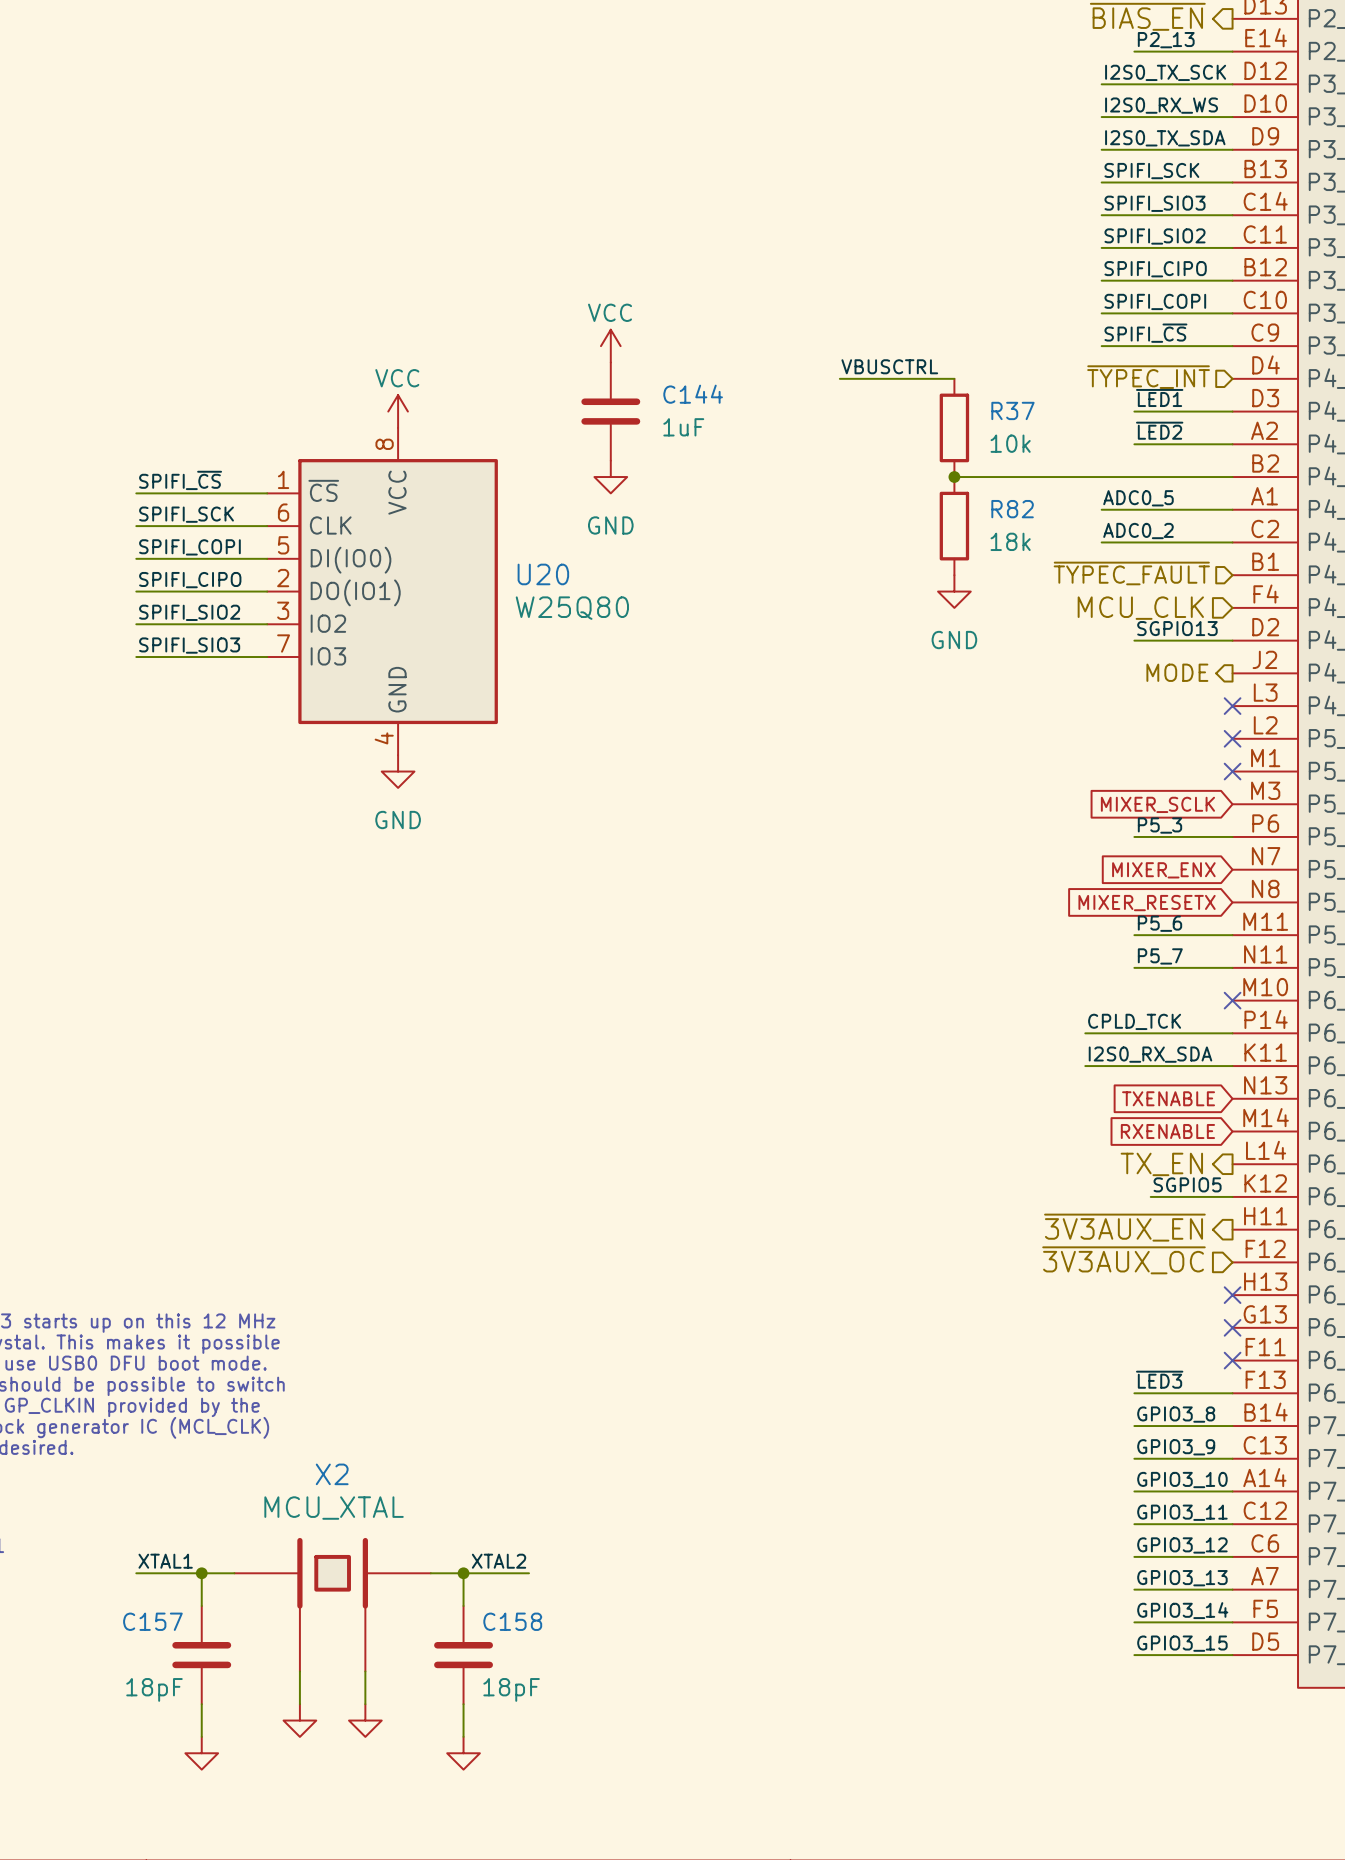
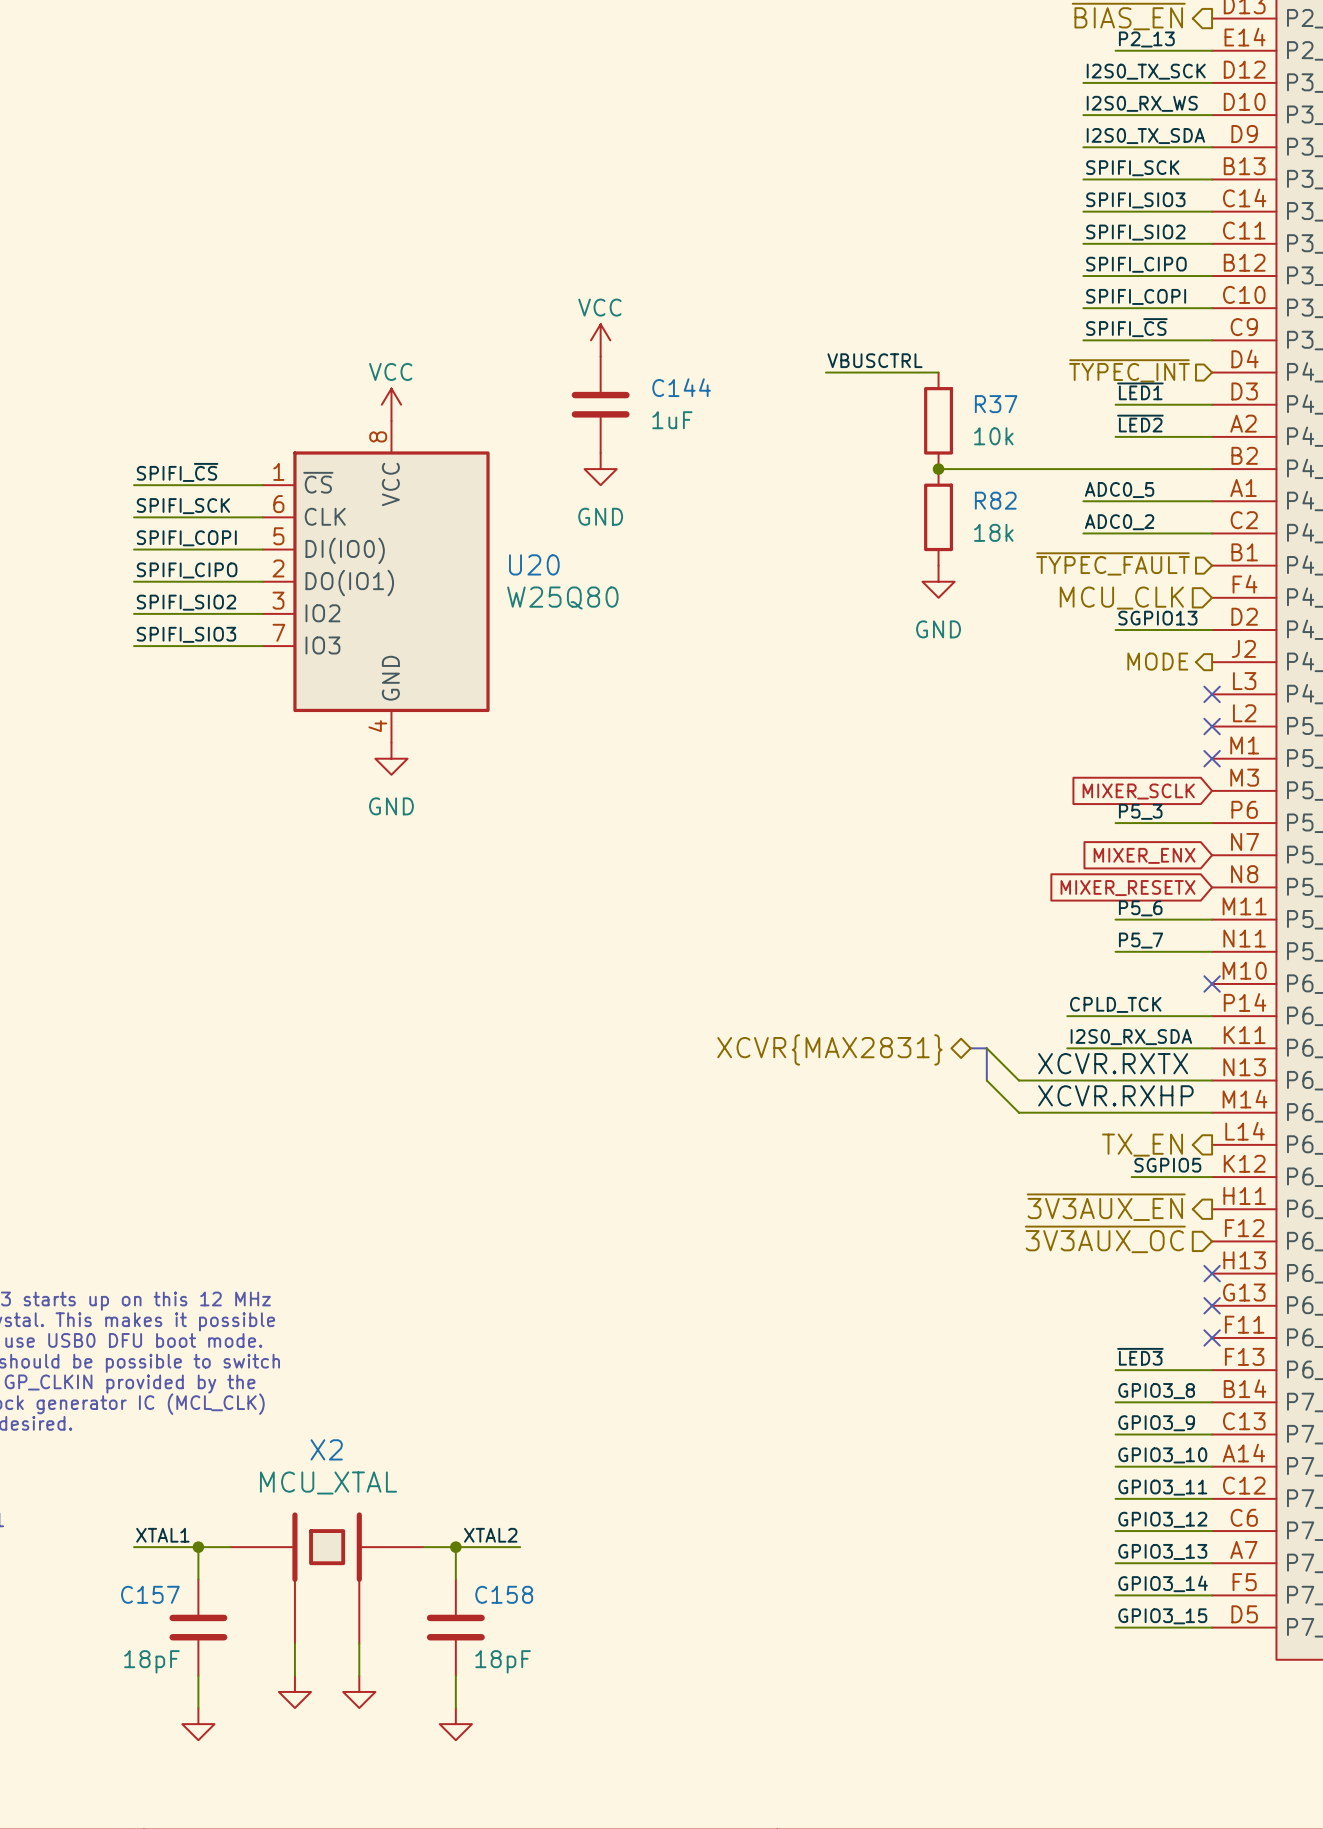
bus: none -> (970, 1048) (986, 1048) (986, 1080)
wire: none -> (986, 1048) (1019, 1080) (1212, 1080)
hierarchical label: none -> XCVR{MAX2831} (829, 1049)
label: none -> XCVR.RXTX (1113, 1063)
wire: none -> (986, 1080) (1019, 1112) (1212, 1112)
global label: TXENABLE (1168, 1098) -> none
label: none -> XCVR.RXHP (1115, 1095)
global label: RXENABLE (1167, 1131) -> none

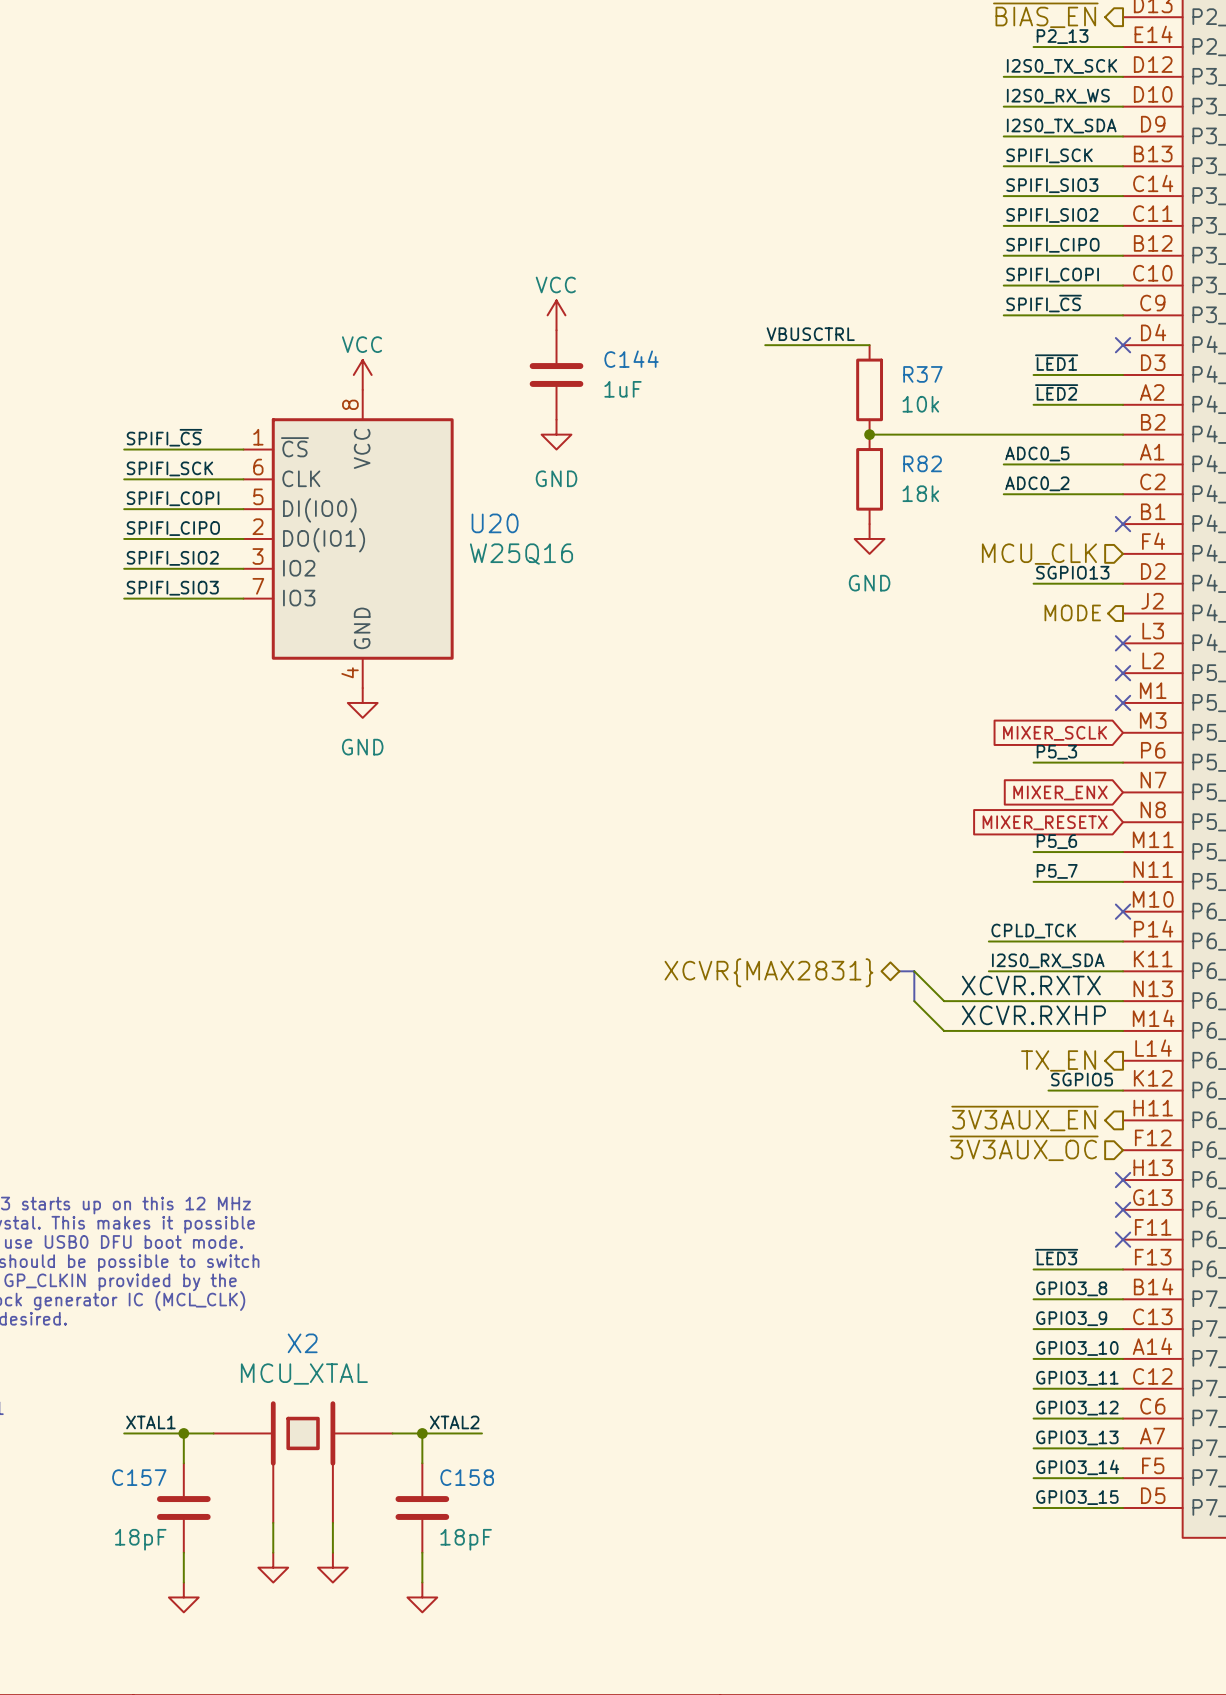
hierarchical label: ~{TYPEC_INT} (1129, 370) -> none
no-connect mark: none -> (1123, 345)
hierarchical label: ~{TYPEC_FAULT} (1112, 563) -> none
no-connect mark: none -> (1123, 524)
U20 value: W25Q80 (562, 598) -> W25Q16 (521, 554)

